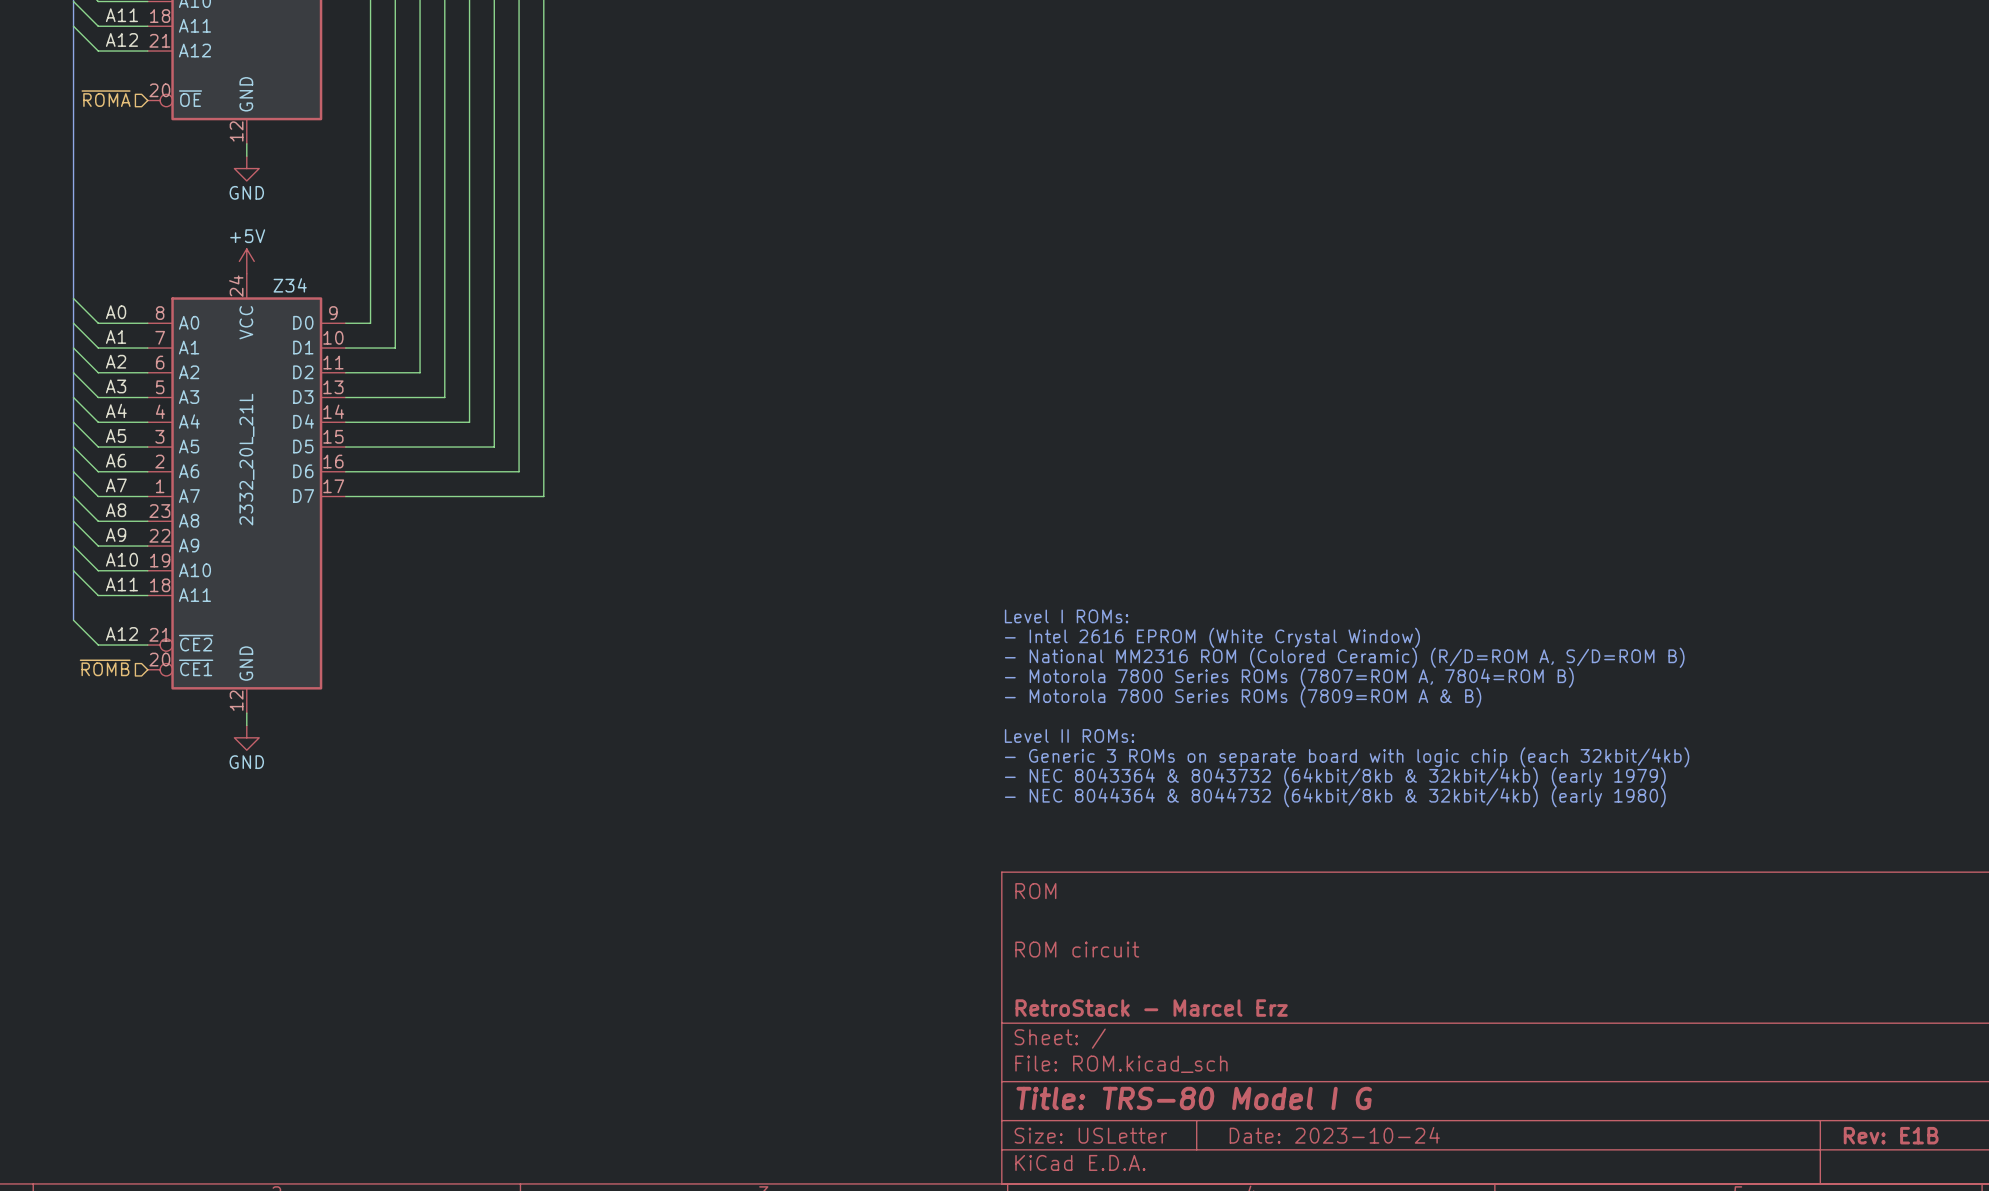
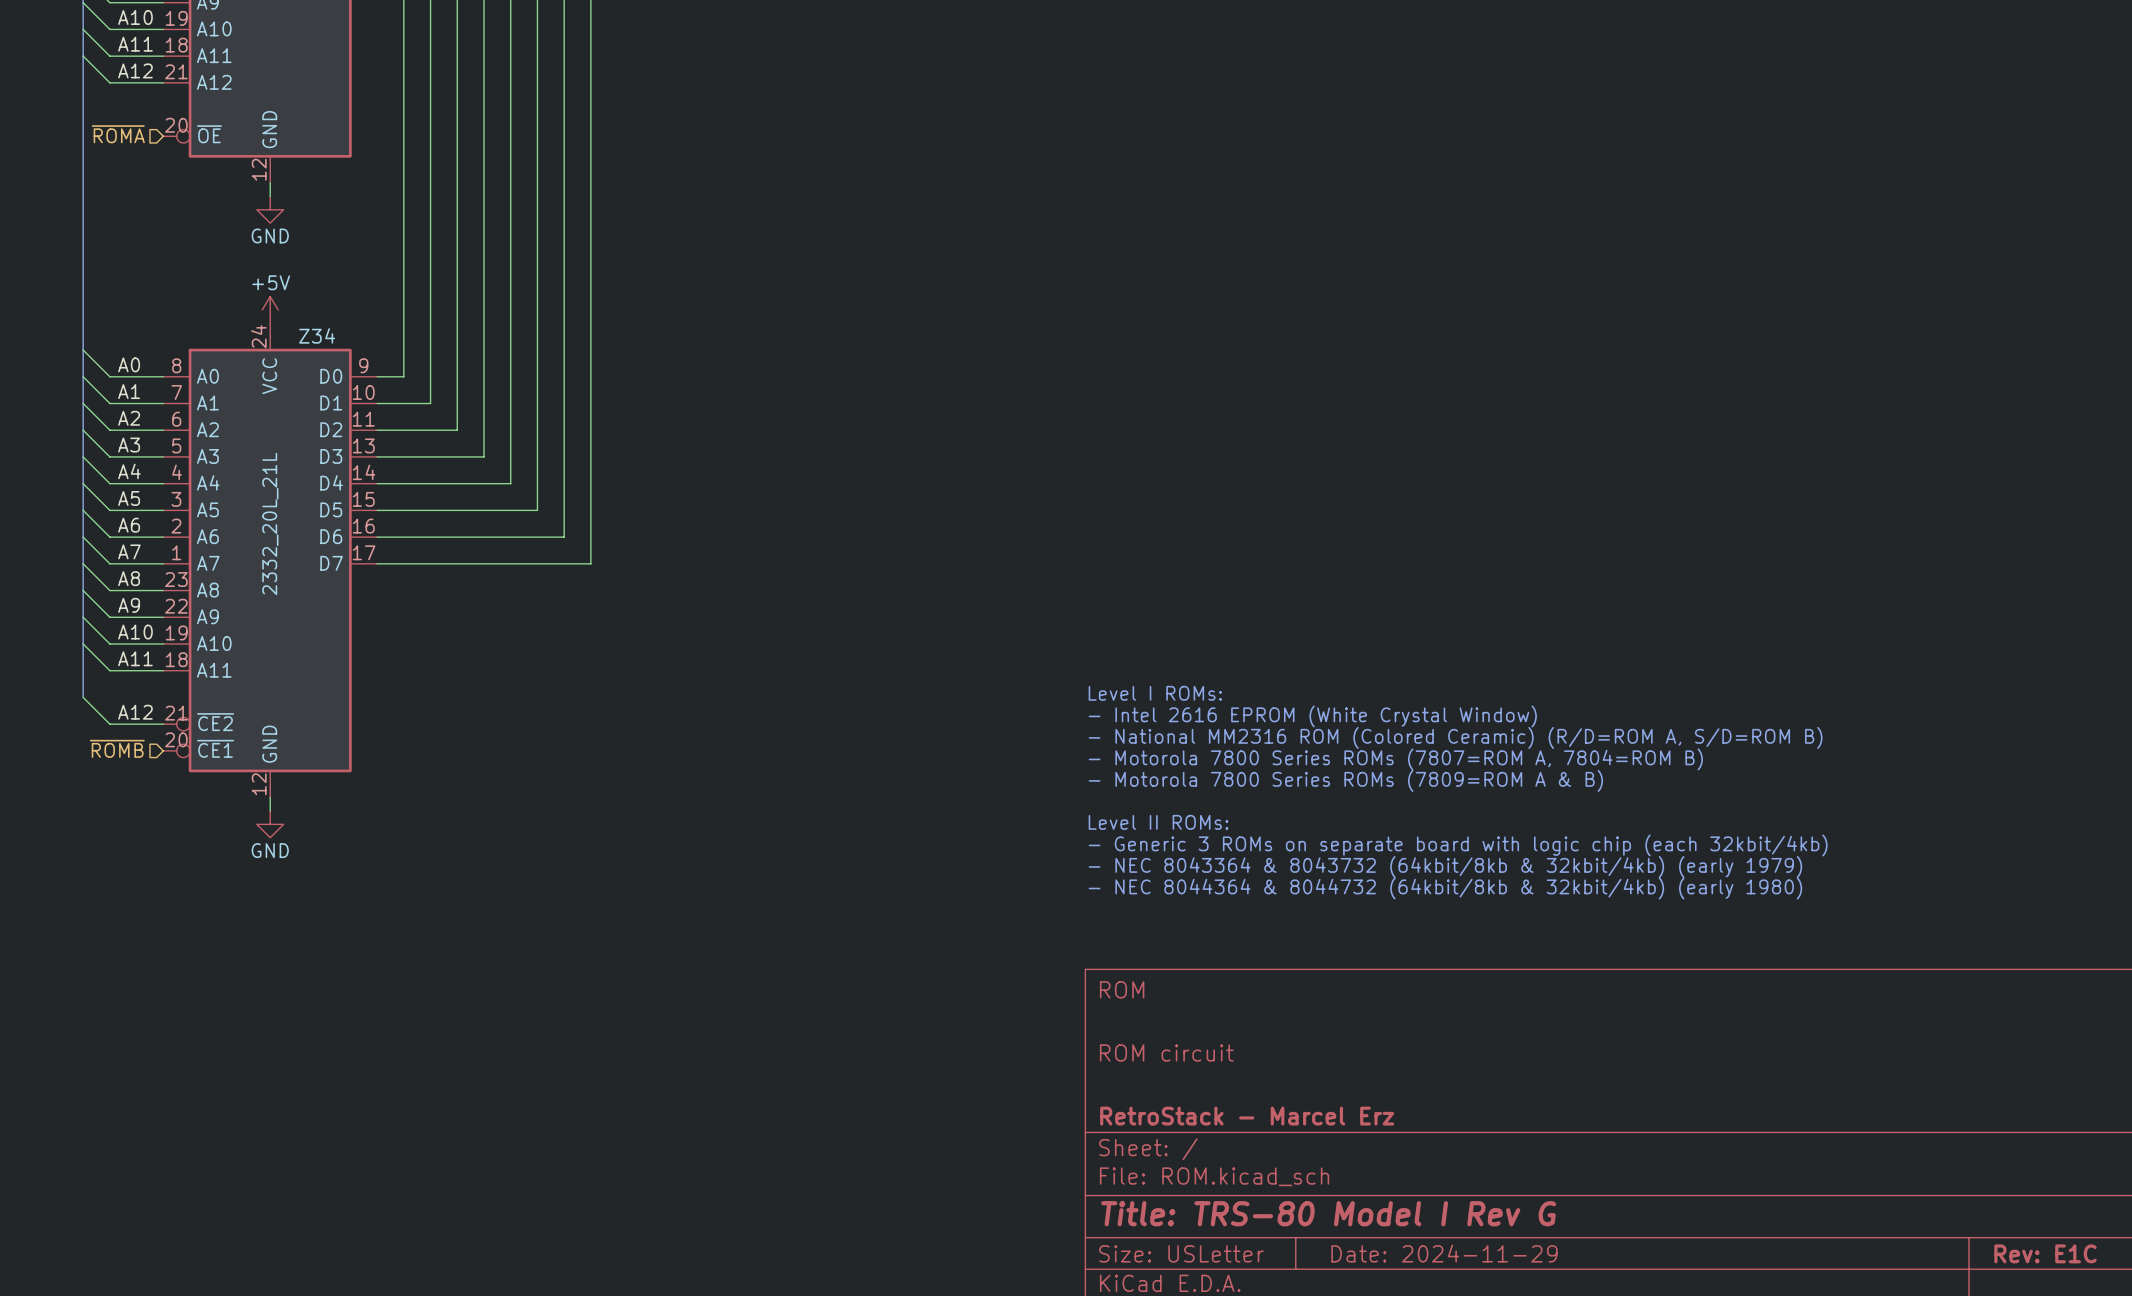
title block: Title: TRS-80 Model I G (1194, 1098) -> Title: TRS-80 Model I Rev G (1328, 1213)
title block: Date: 2023-10-24 (1334, 1135) -> Date: 2024-11-29 (1444, 1253)
title block: Rev: E1B (1891, 1135) -> Rev: E1C (2045, 1253)

